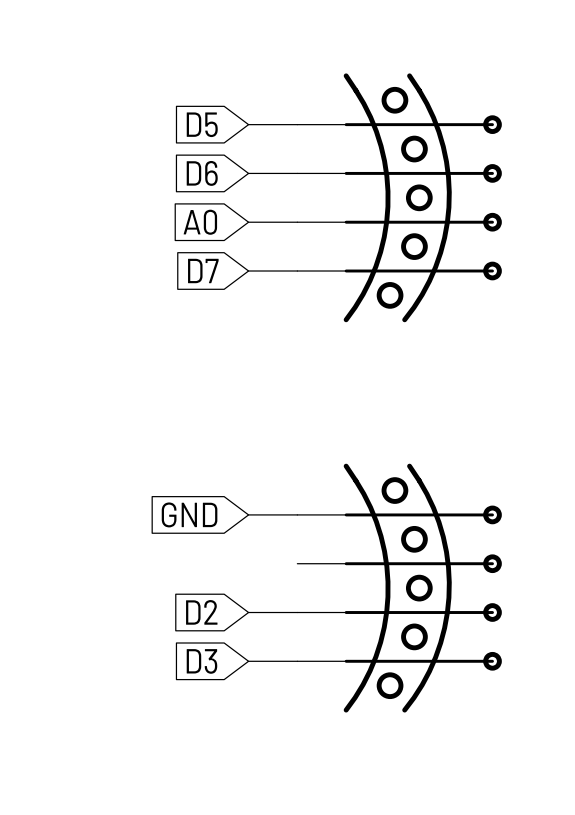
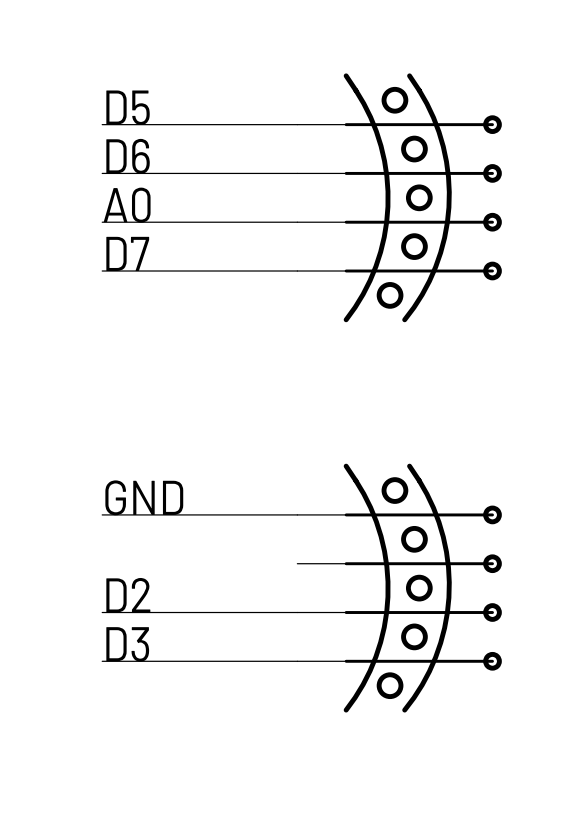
label: none -> D5 (128, 107)
wire: none -> (102, 124) (248, 124)
global label: D5 (202, 124) -> none
label: none -> D6 (128, 156)
wire: none -> (102, 173) (248, 173)
global label: D6 (202, 173) -> none
label: none -> A0 (127, 205)
wire: none -> (102, 222) (248, 222)
global label: A0 (200, 222) -> none
label: none -> D7 (127, 253)
wire: none -> (102, 271) (248, 271)
global label: D7 (203, 271) -> none
label: none -> GND (144, 497)
wire: none -> (102, 514) (248, 514)
global label: GND (189, 514) -> none
label: none -> D2 (128, 595)
wire: none -> (102, 612) (248, 612)
global label: D2 (201, 612) -> none
label: none -> D3 (127, 644)
wire: none -> (102, 661) (248, 661)
global label: D3 (201, 661) -> none

